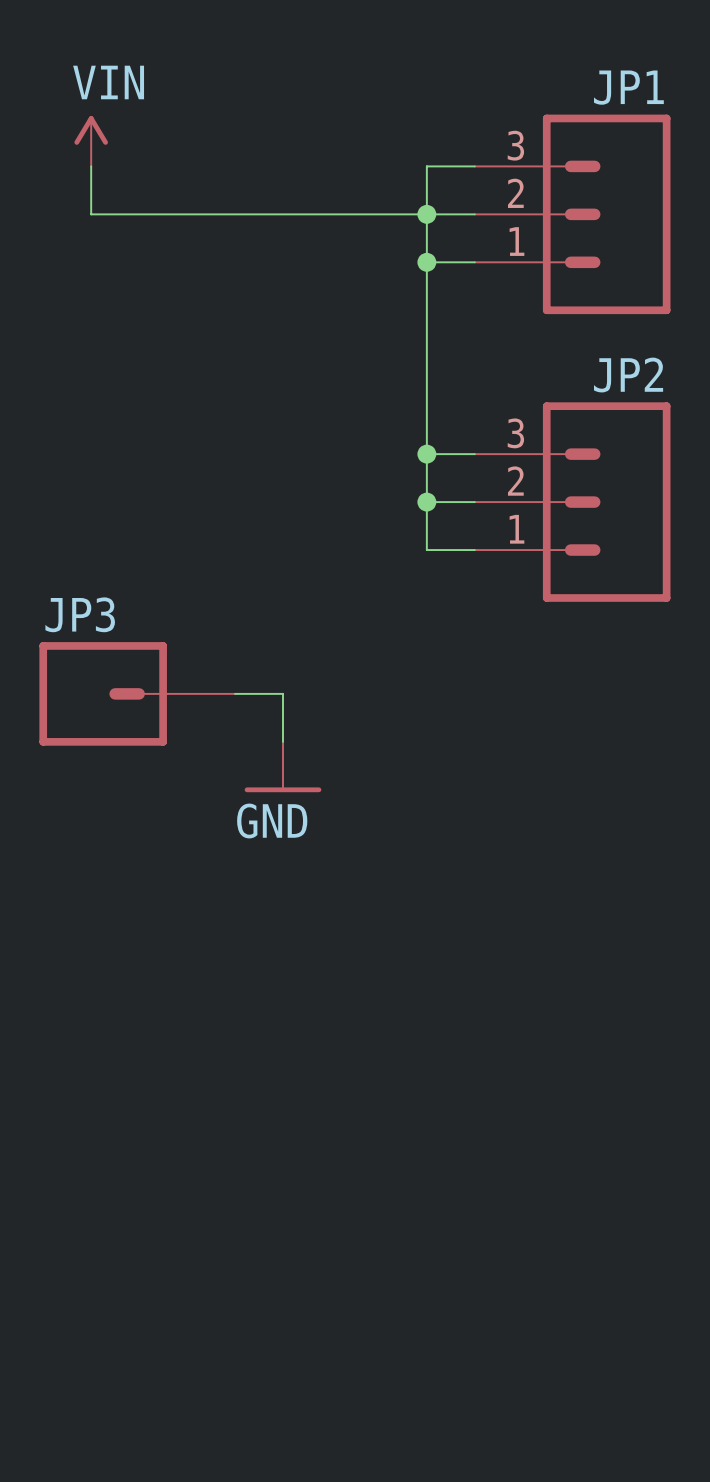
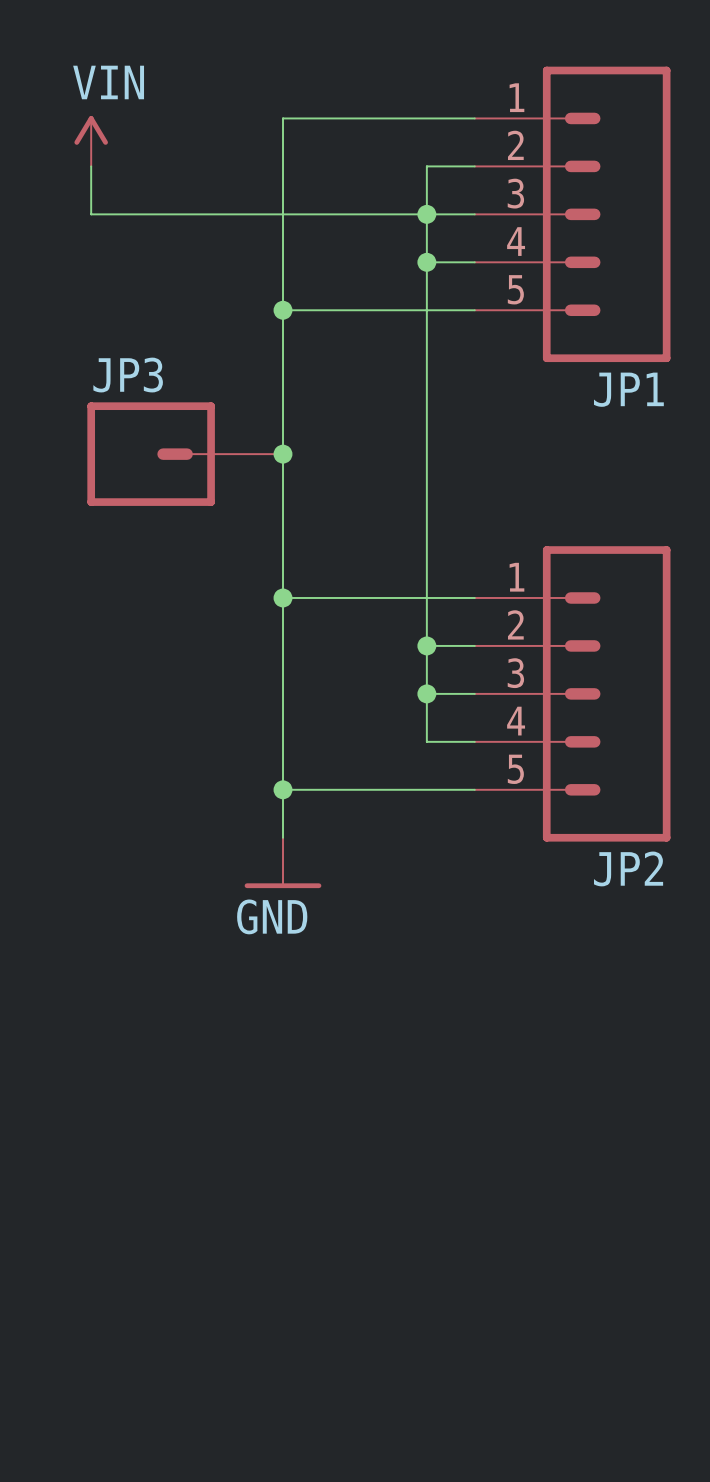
JP1 name position: JP1 (628, 87) -> JP1 (628, 389)
JP1 symbol: [474, 114, 671, 315] -> [474, 66, 671, 363]
wire: none -> (283, 310) (474, 310)
junction: none -> (283, 310)
JP2 name position: JP2 (628, 375) -> JP2 (628, 868)
JP2 symbol: [474, 402, 671, 602] -> [474, 546, 671, 842]
junction: none -> (283, 454)
wire: (426, 454) (474, 454) -> (426, 693) (474, 693)
junction: (426, 454) -> none
wire: (426, 502) (474, 502) -> (426, 645) (474, 645)
junction: (426, 502) -> none
wire: (426, 550) (474, 550) -> (426, 550) (426, 741) (474, 741)
wire: none -> (283, 597) (474, 597)
junction: none -> (283, 597)
junction: none -> (426, 645)
JP3 position: (137, 693) -> (185, 454)
wire: (235, 693) (283, 693) -> (474, 118) (283, 118) (283, 693)
junction: none -> (426, 693)
power symbol position: GND (283, 767) -> GND (283, 862)
wire: none -> (283, 789) (474, 789)
junction: none -> (283, 789)

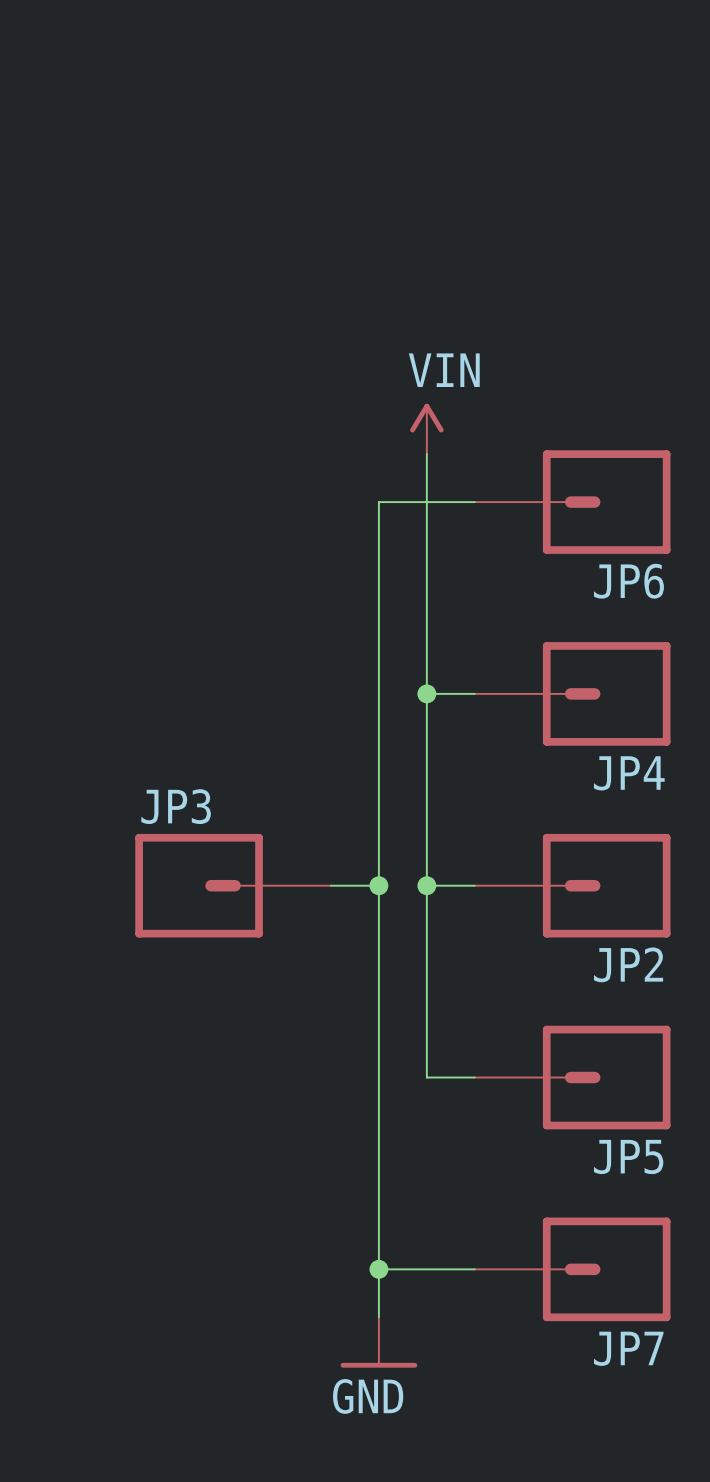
wire: (474, 118) (283, 118) (283, 837) -> none
power symbol position: VIN (91, 141) -> VIN (426, 428)
wire: (91, 166) (91, 214) (474, 214) -> none
wire: (474, 166) (426, 166) (426, 454) -> none
junction: (426, 214) -> none
JP1: (572, 214) -> none
wire: (426, 262) (474, 262) -> none
junction: (426, 262) -> none
wire: (283, 310) (474, 310) -> none
junction: (283, 310) -> none
JP3 position: (185, 454) -> (233, 885)
junction: (283, 454) -> none
wire: none -> (474, 502) (378, 502) (378, 1317)
JP6: none -> (572, 502)
JP2 symbol: [474, 546, 671, 842] -> [474, 833, 671, 938]
wire: (283, 597) (474, 597) -> none
junction: (283, 597) -> none
wire: (426, 645) (474, 645) -> (426, 885) (474, 885)
junction: (426, 645) -> none
JP4: none -> (572, 693)
wire: (426, 741) (474, 741) -> (426, 741) (426, 1077) (474, 1077)
wire: (283, 789) (474, 789) -> none
junction: (283, 789) -> none
power symbol: GND (283, 862) -> none
JP2 name position: JP2 (628, 868) -> JP2 (628, 964)
wire: none -> (330, 885) (378, 885)
junction: none -> (378, 885)
junction: none -> (426, 885)
JP5: none -> (572, 1077)
wire: none -> (378, 1269) (474, 1269)
junction: none -> (378, 1269)
JP7: none -> (572, 1269)
power symbol: none -> GND (378, 1342)

